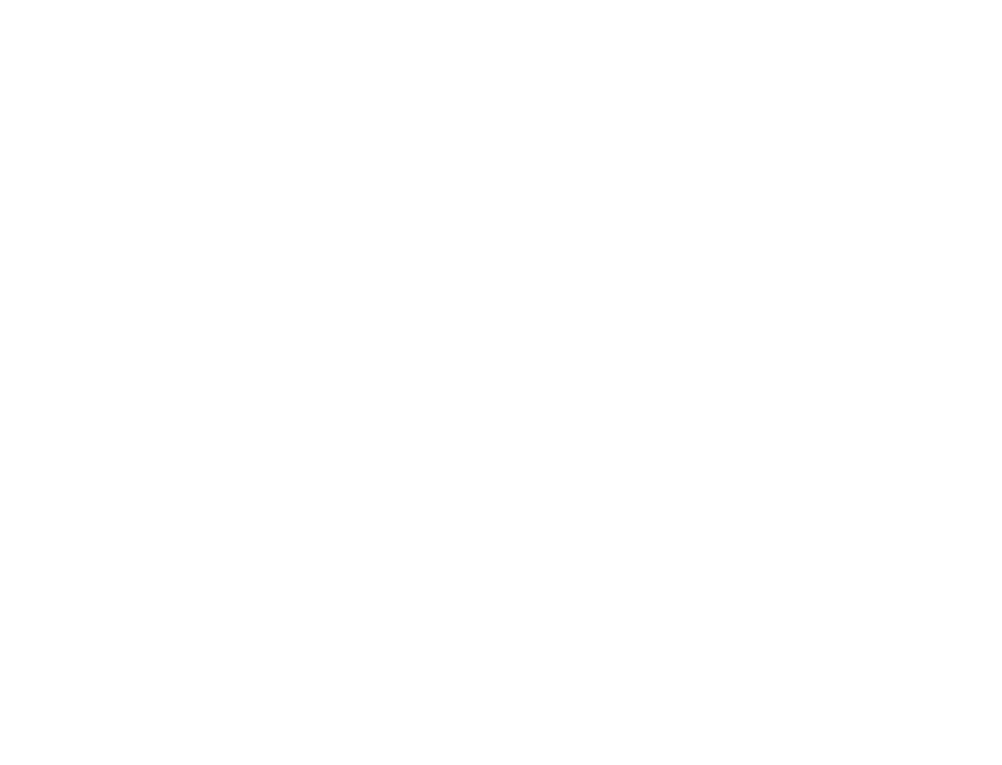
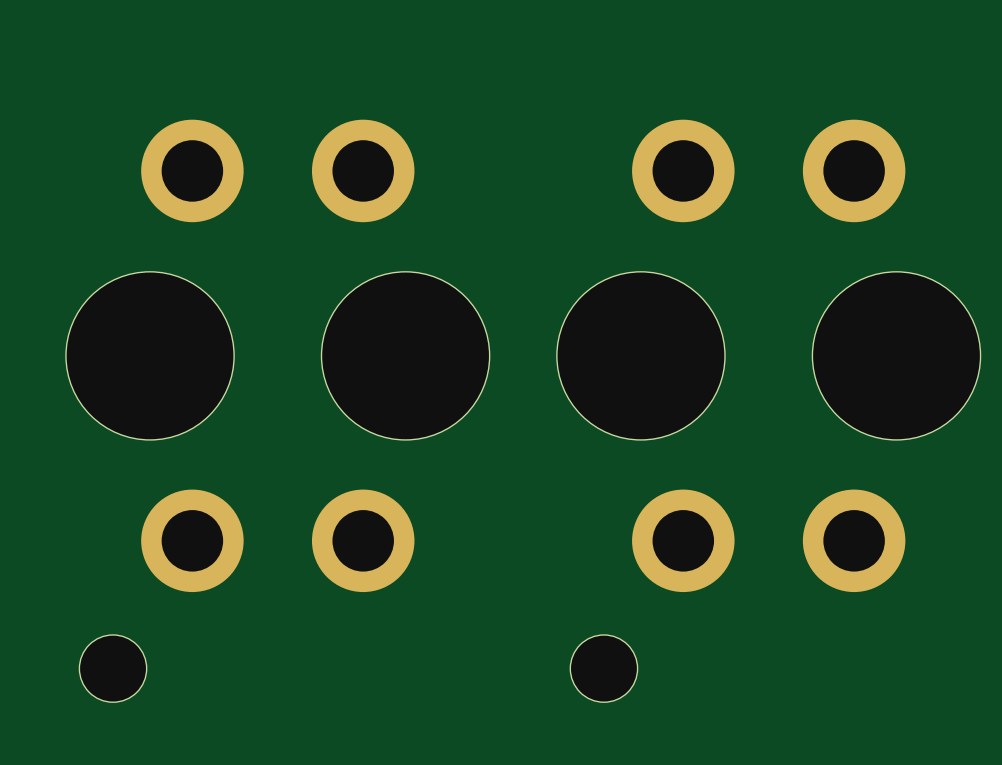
part: none -> (277, 410)
part: none -> (768, 410)

